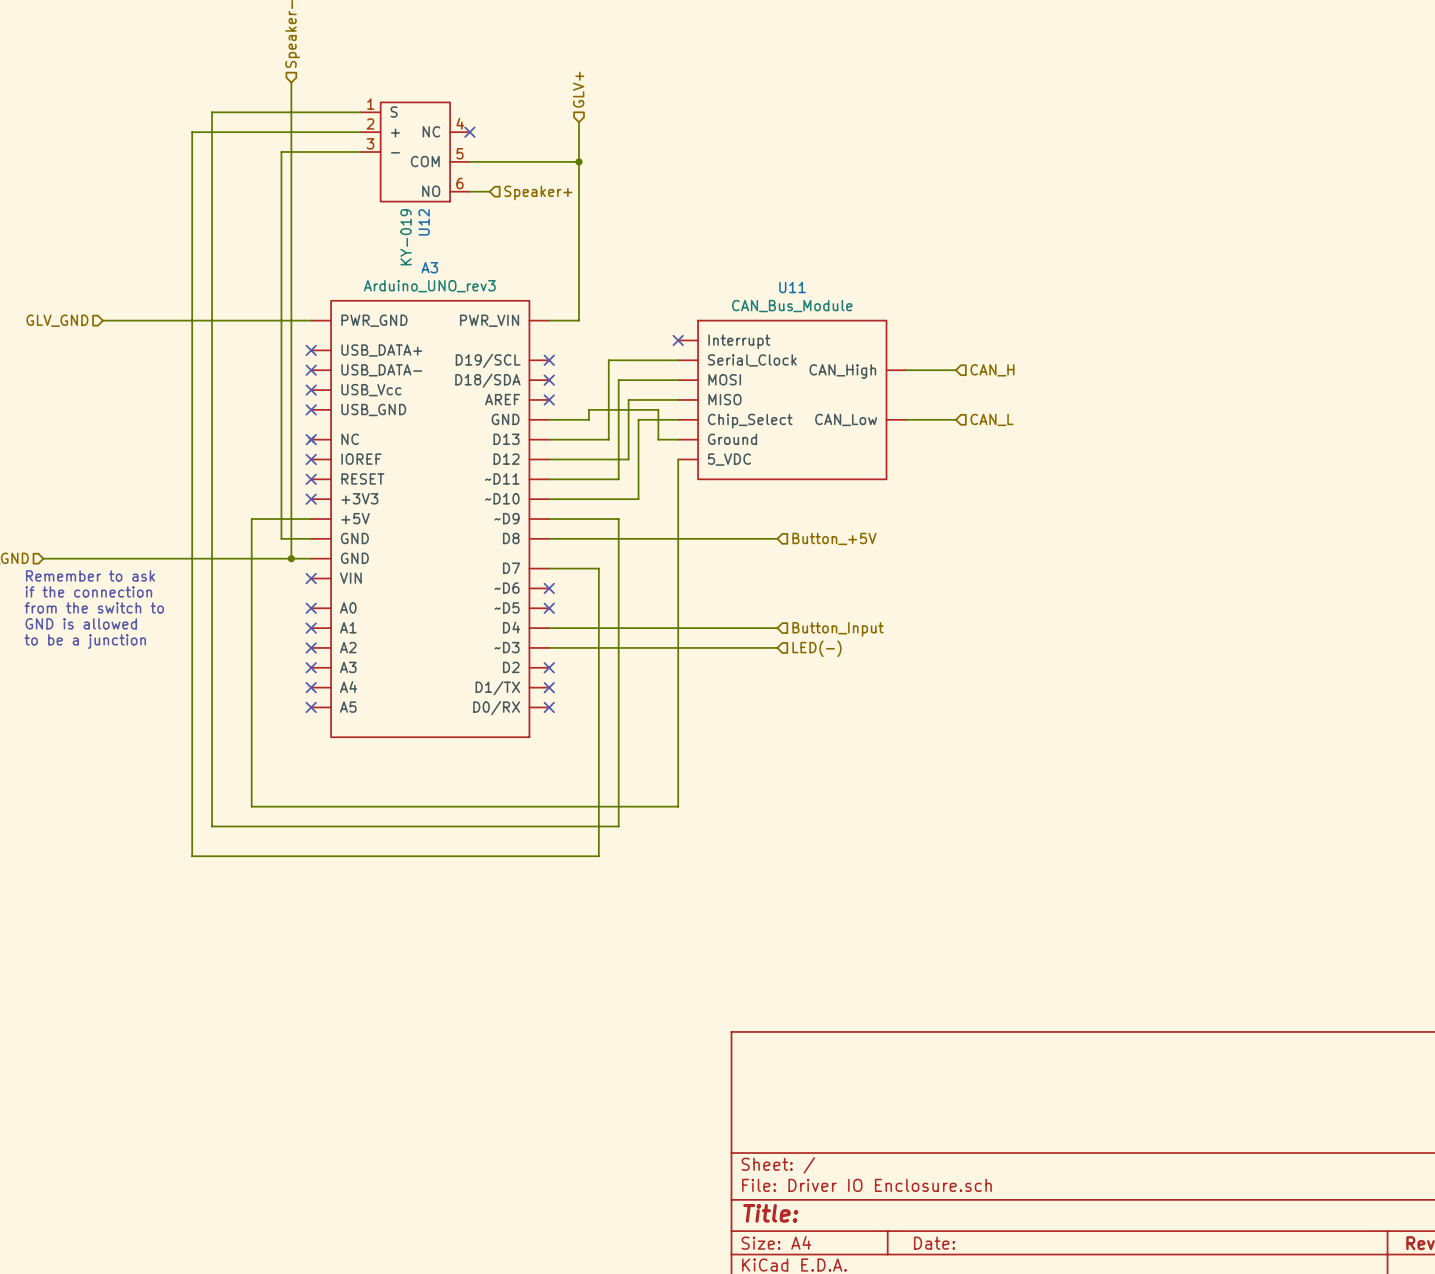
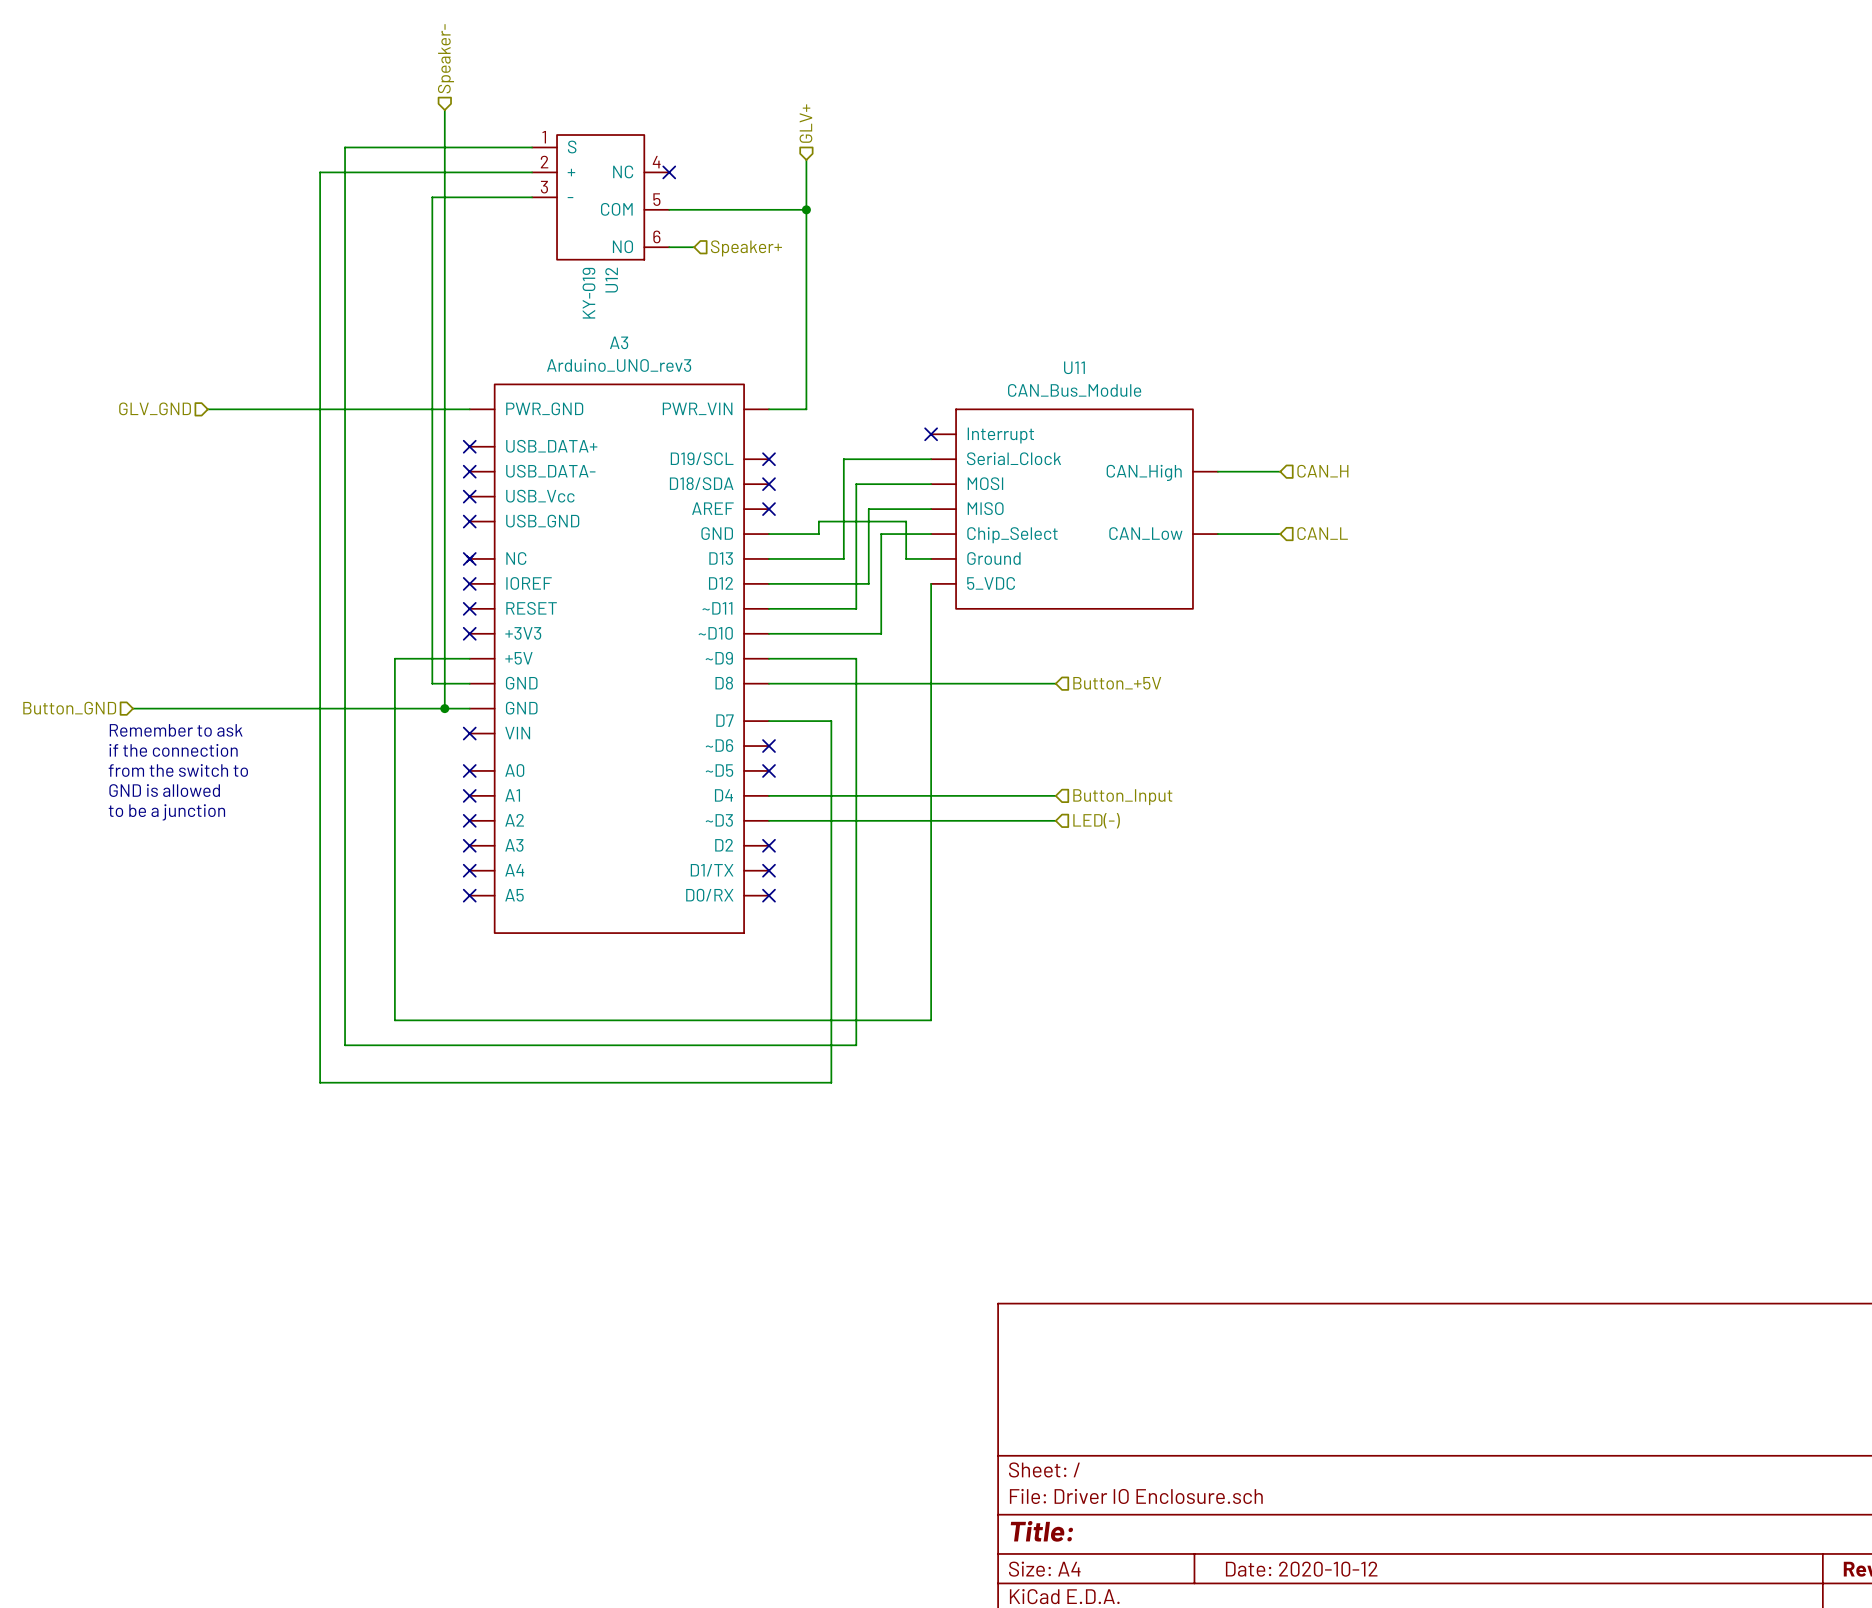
title block: Date: (934, 1243) -> Date: 2020-10-12 (1301, 1569)

